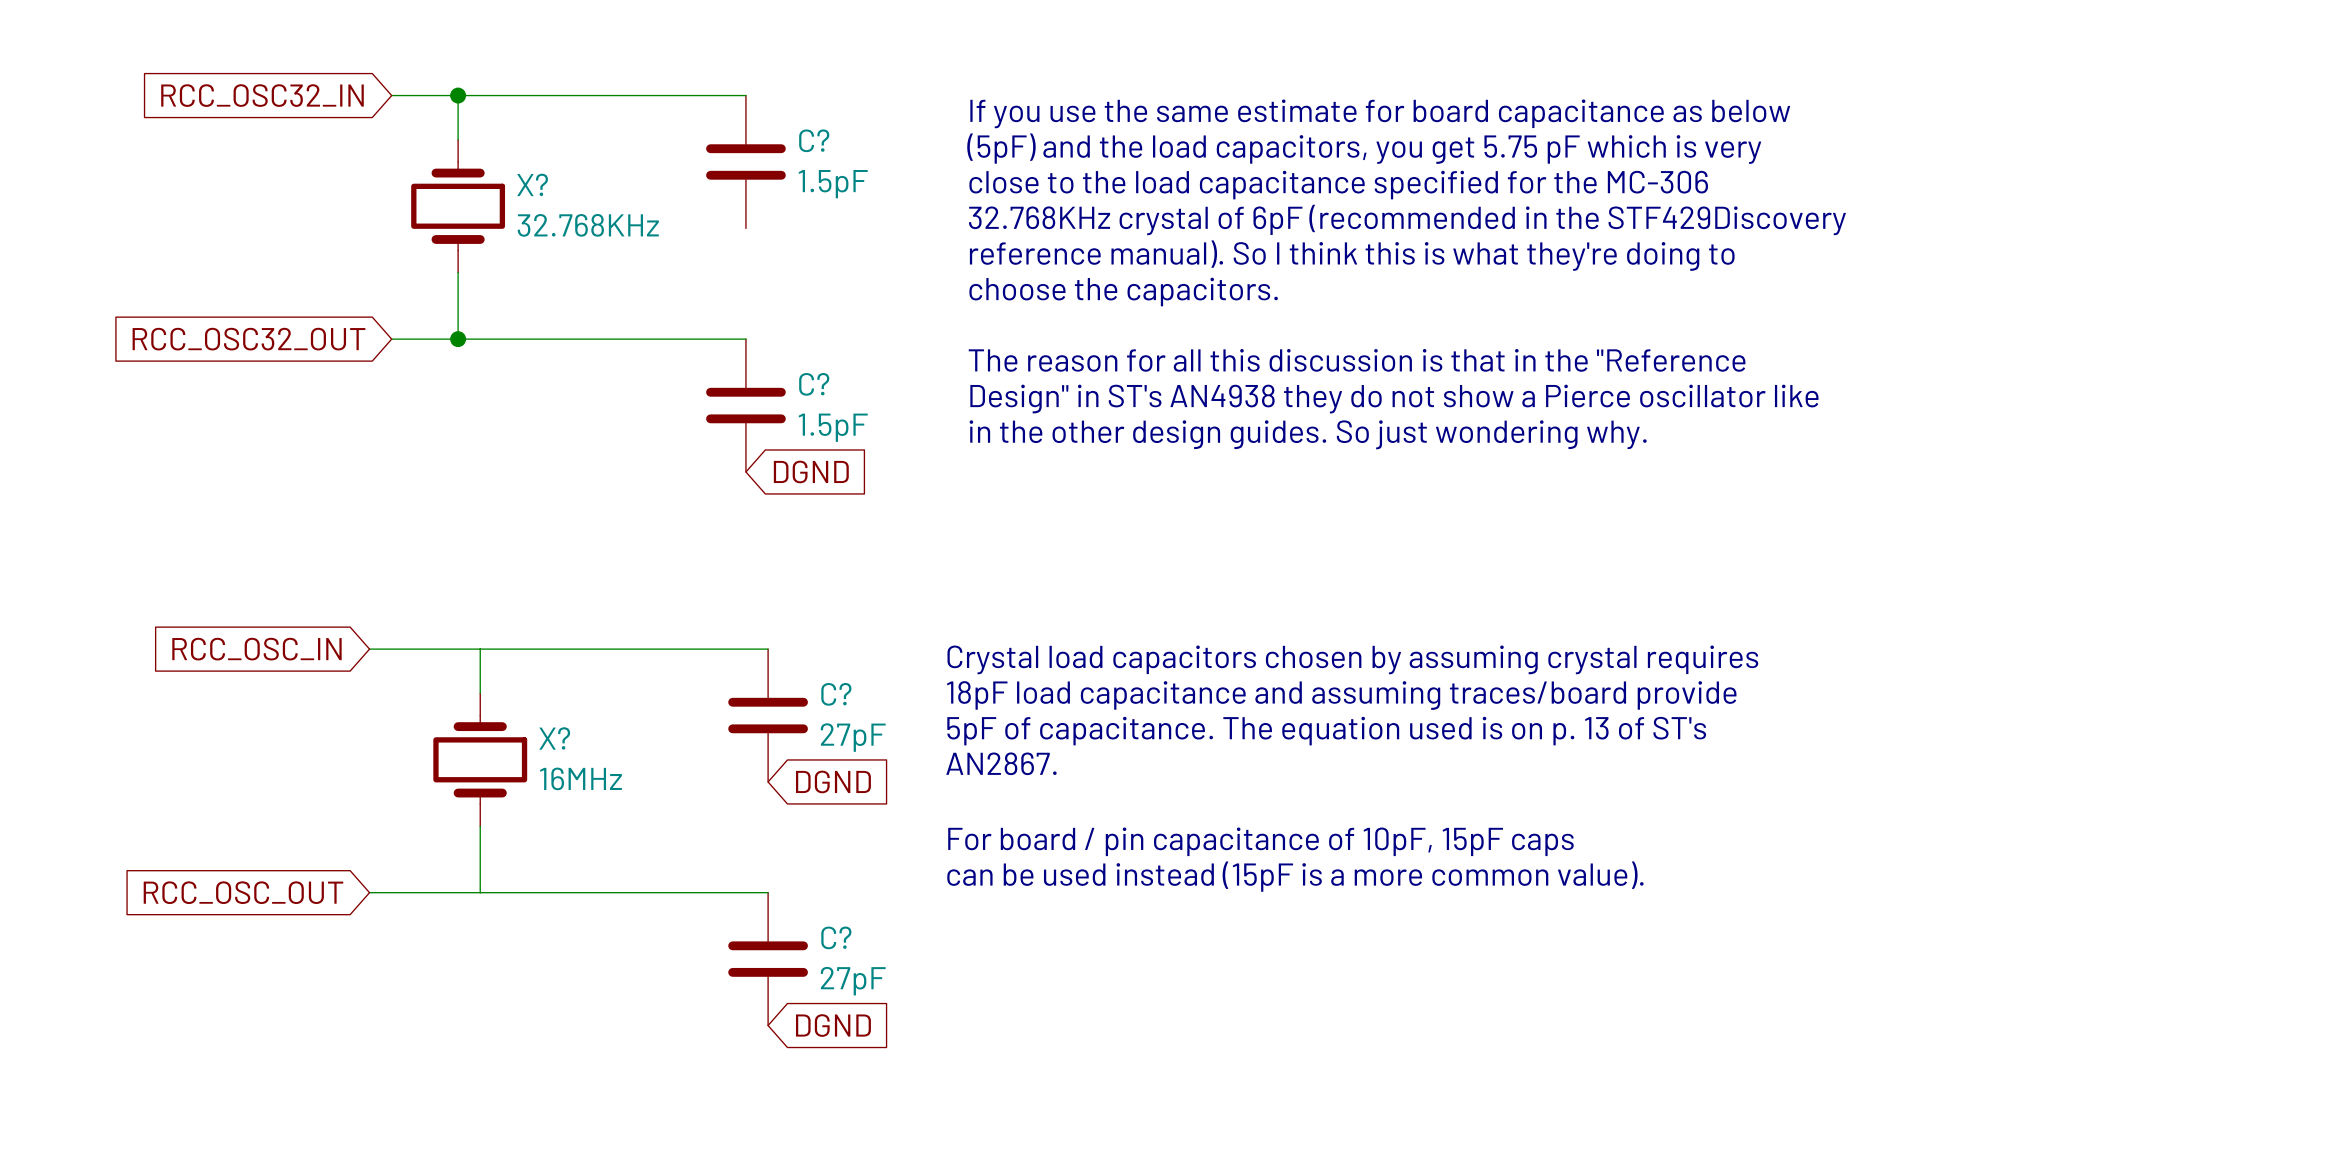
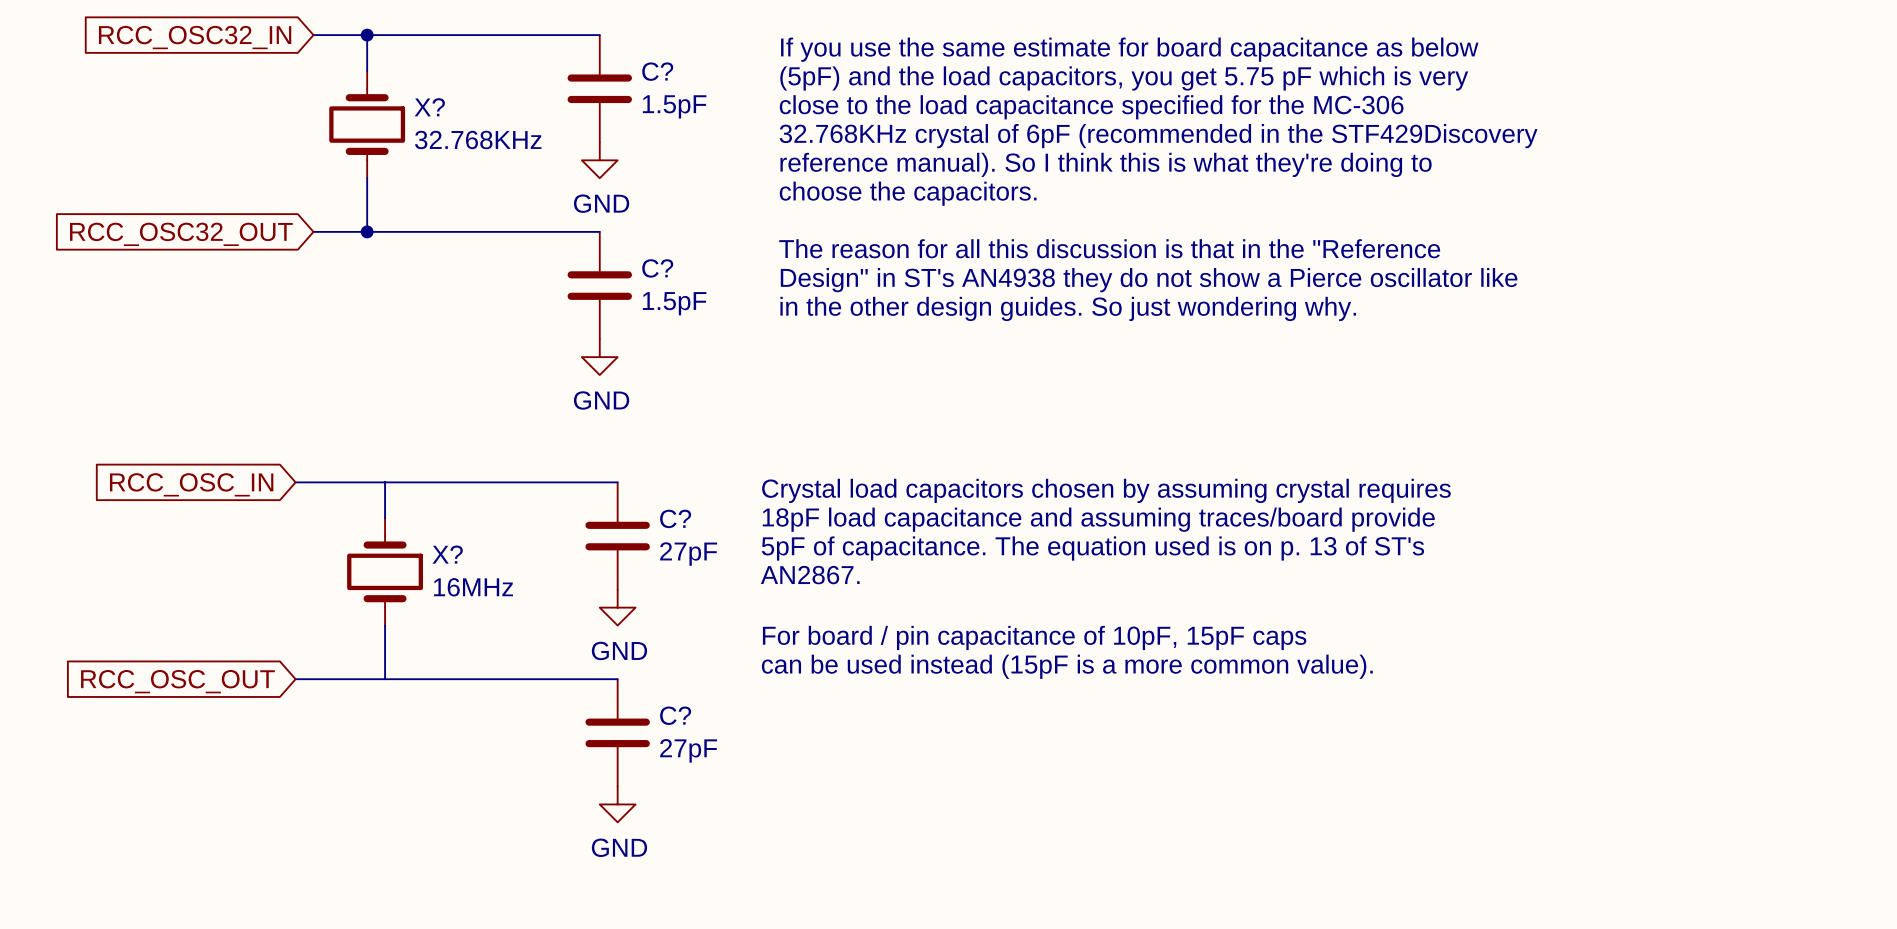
power symbol: none -> GND (599, 160)
global label: DGND (811, 471) -> none
power symbol: none -> GND (599, 357)
global label: DGND (833, 781) -> none
power symbol: none -> GND (617, 607)
global label: DGND (833, 1025) -> none
power symbol: none -> GND (617, 804)

